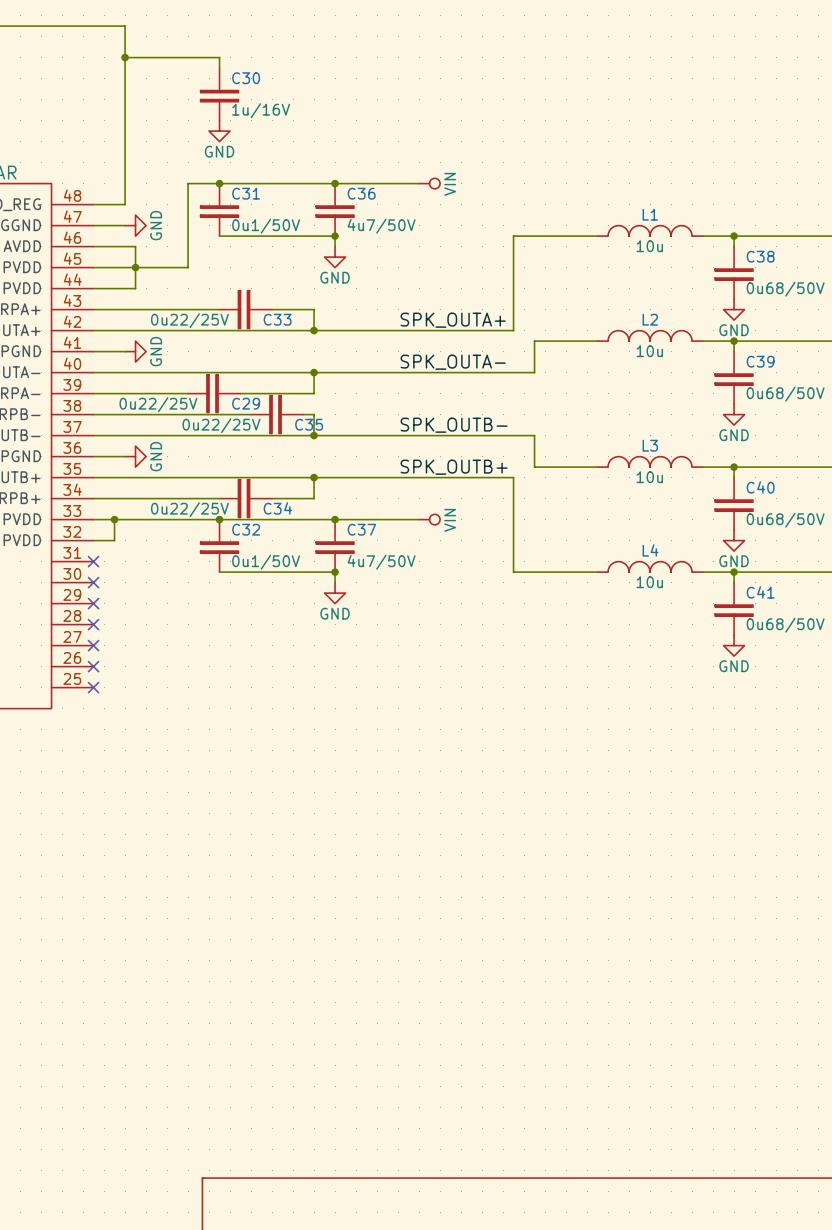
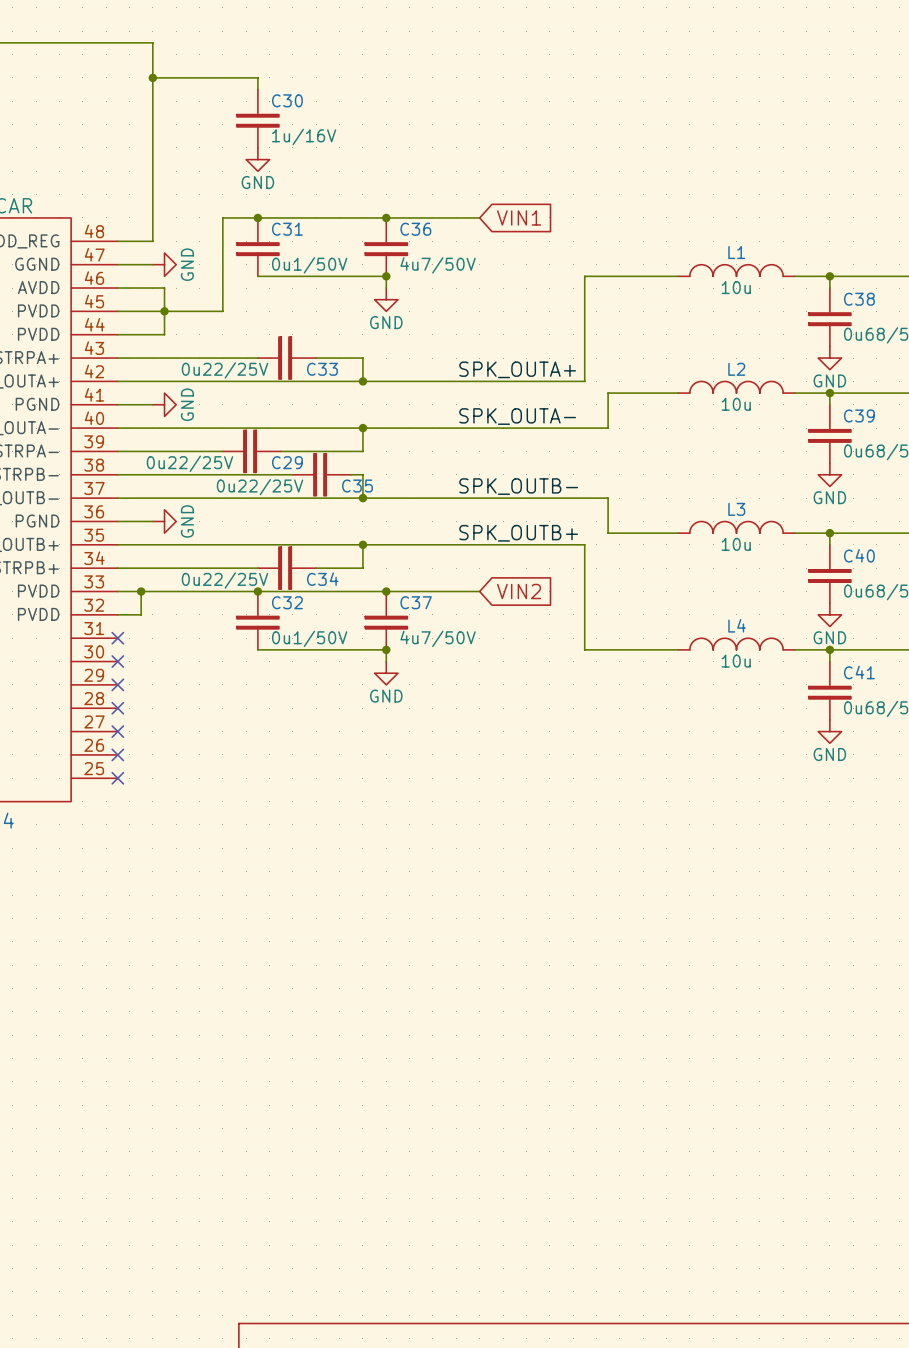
power symbol: VIN (429, 183) -> none
global label: none -> VIN1 (519, 217)
power symbol: VIN (429, 519) -> none
global label: none -> VIN2 (519, 591)

